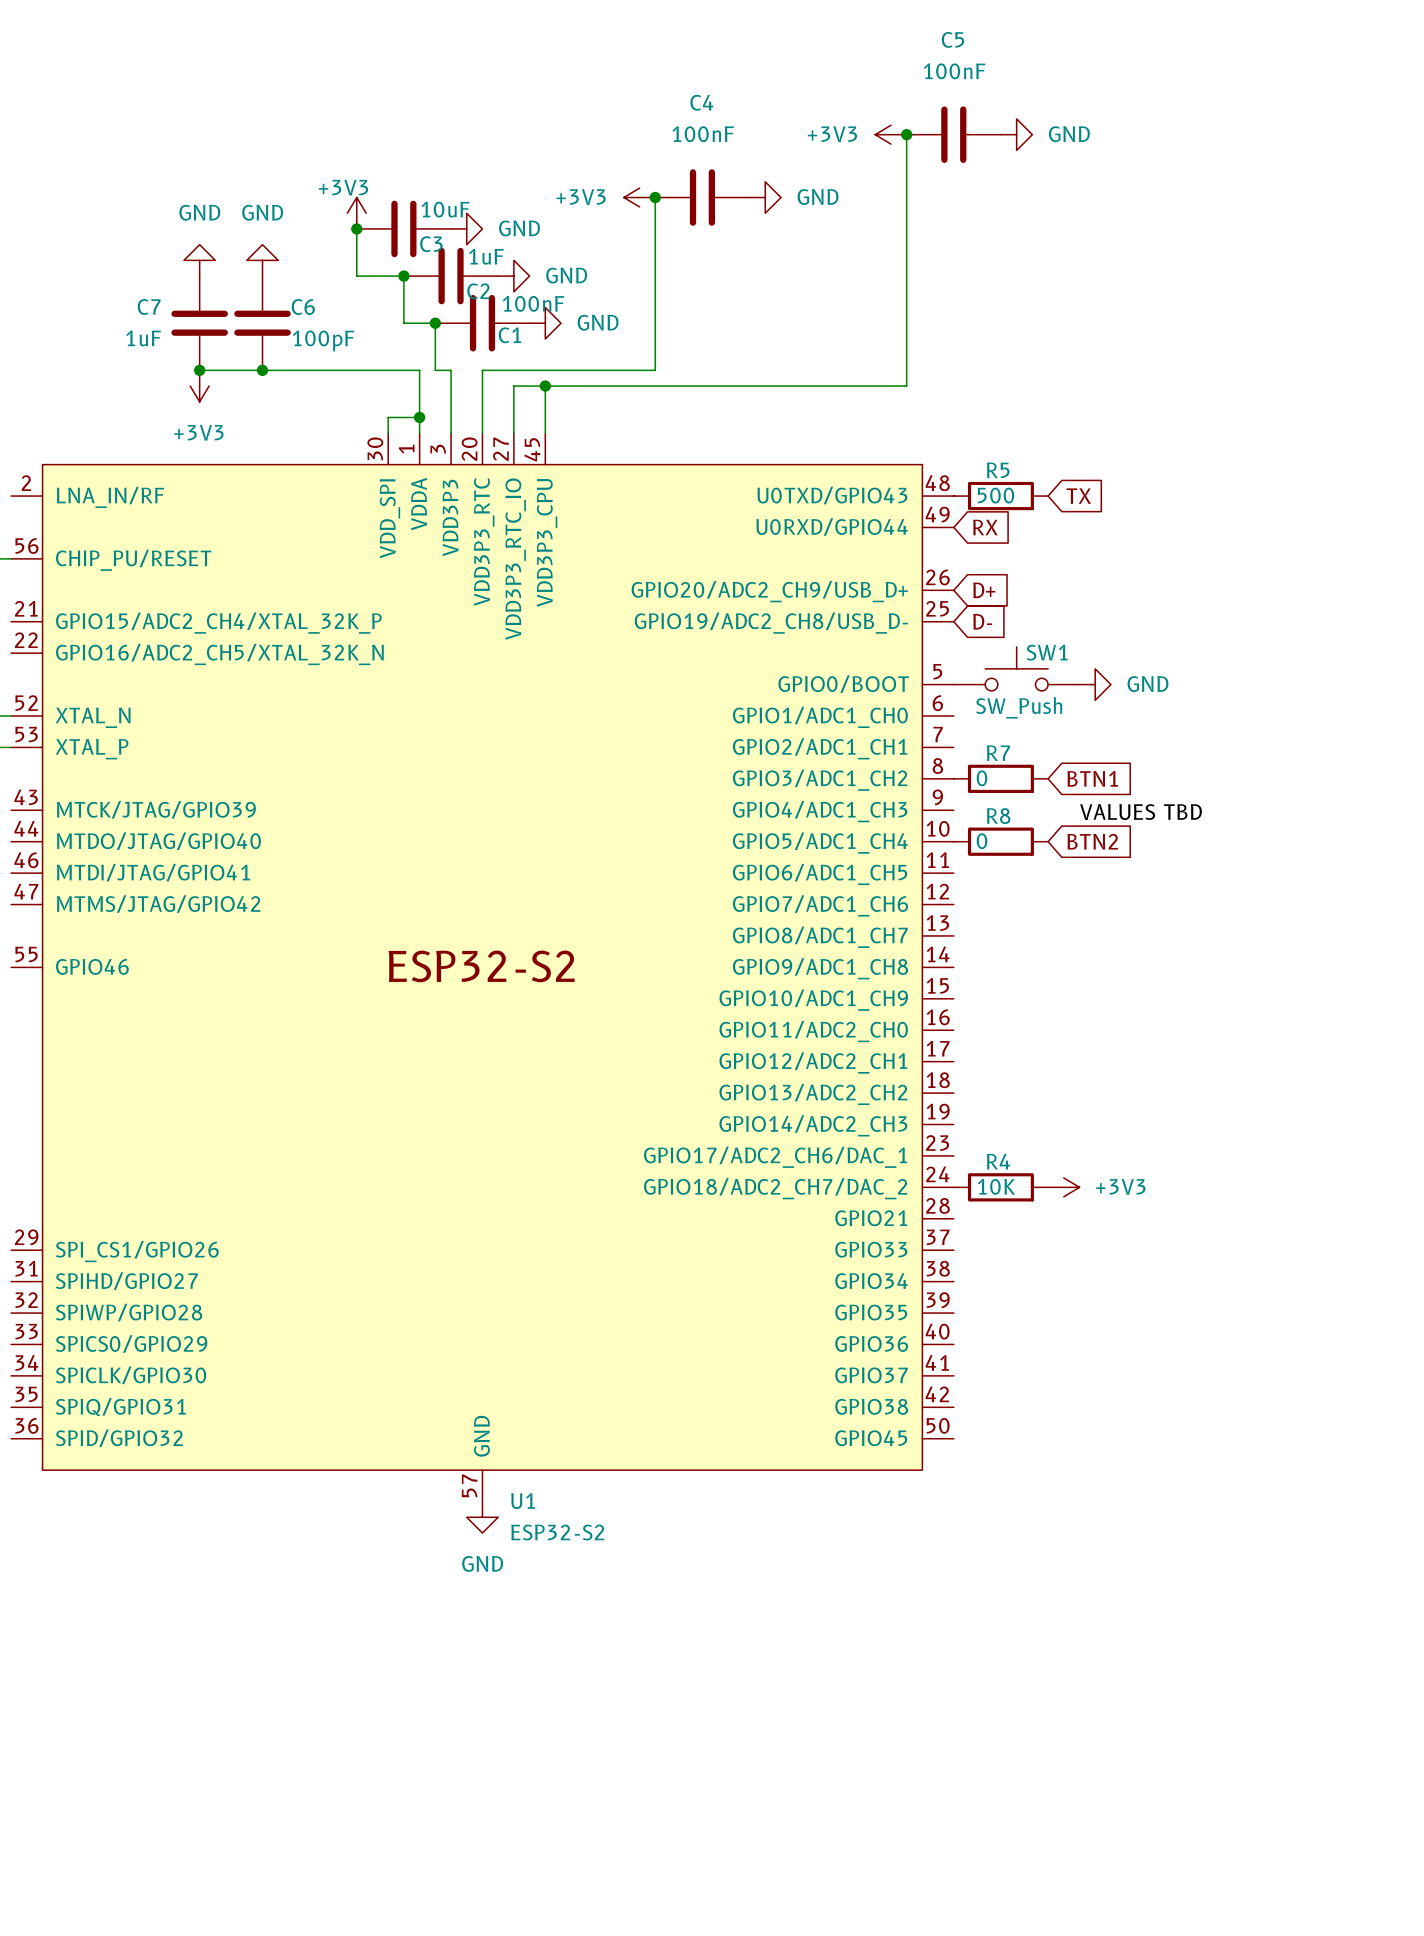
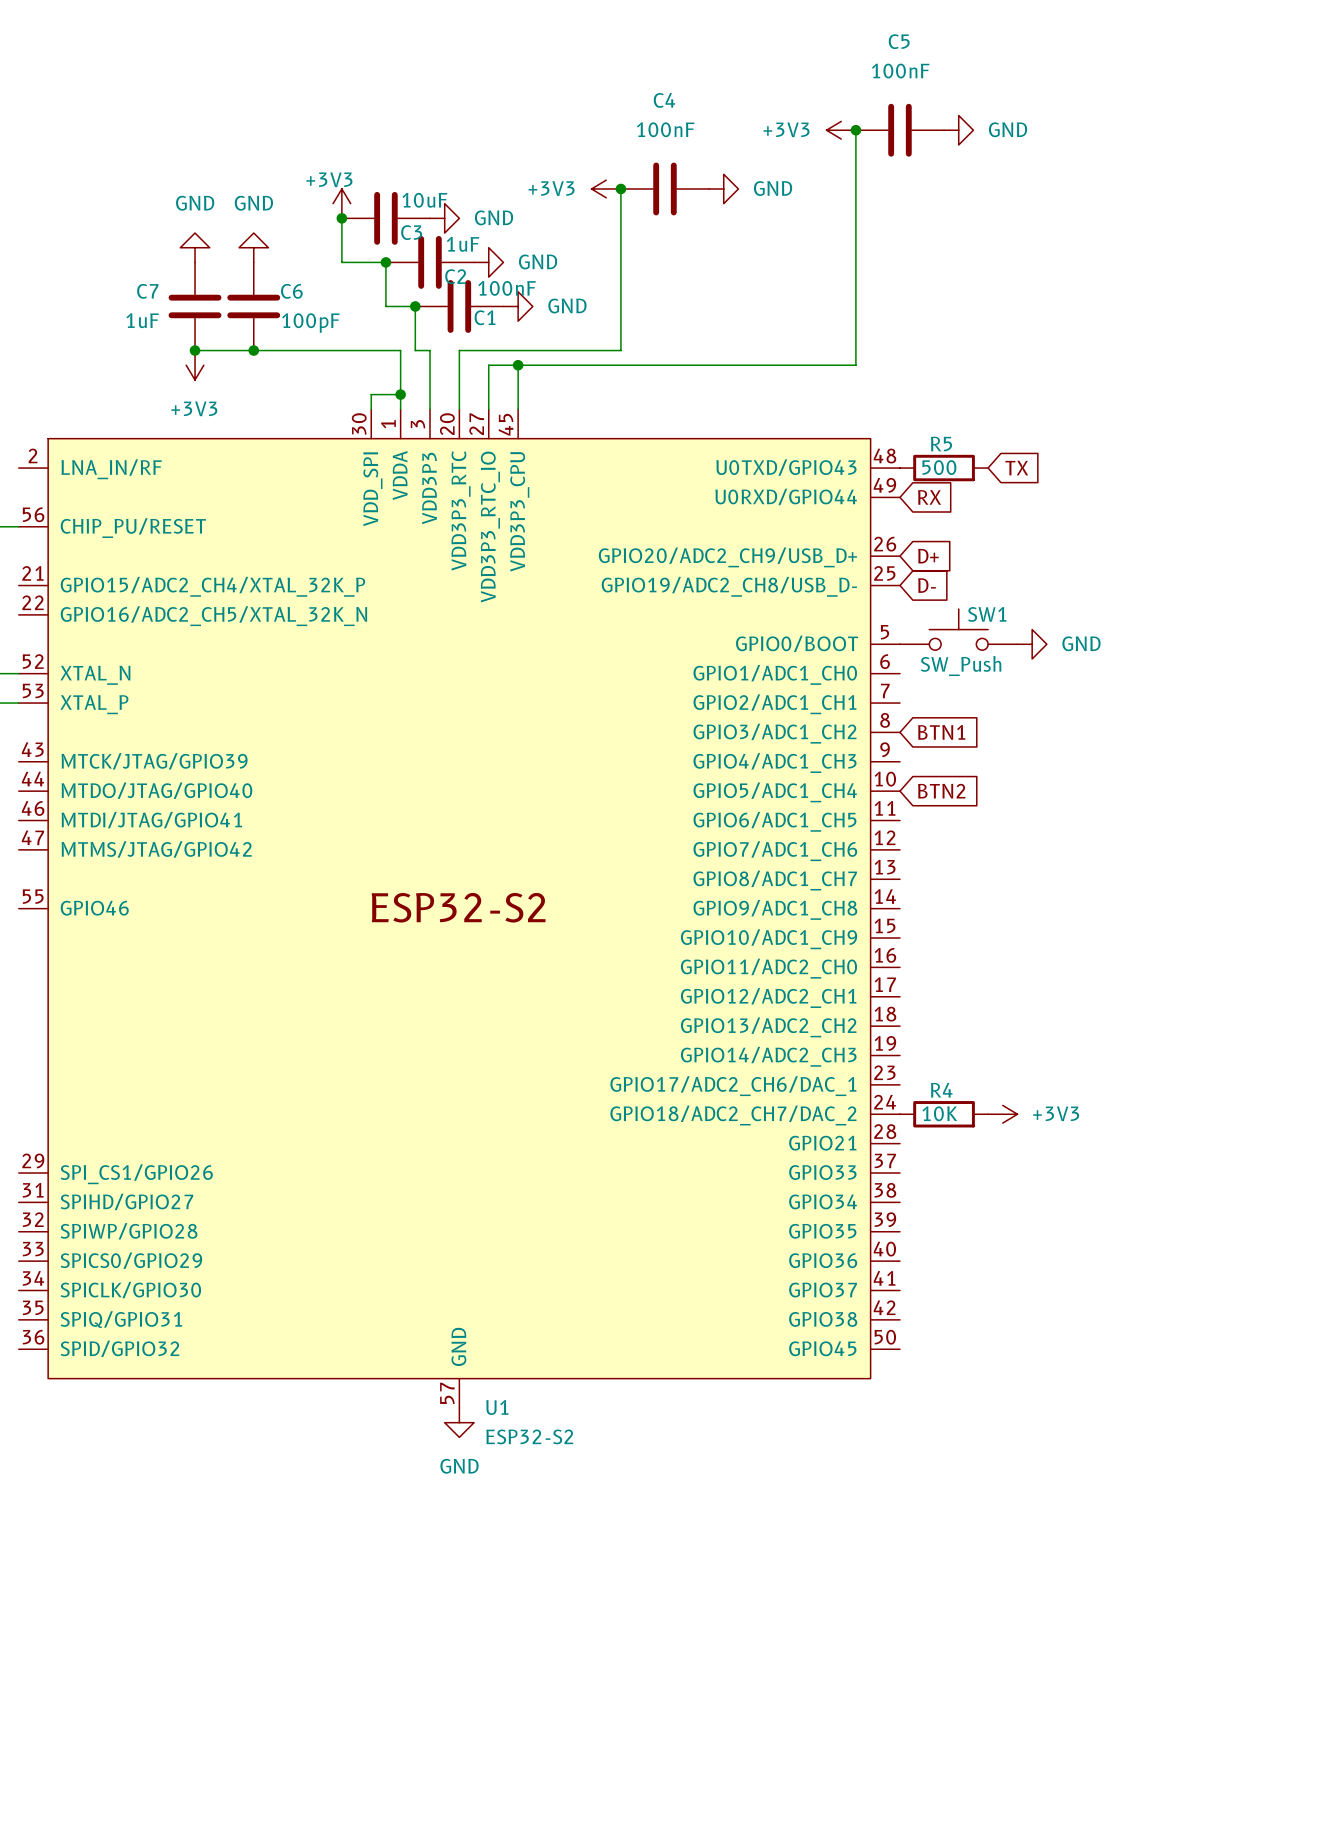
R7: 0 (1000, 778) -> none
global label position: BTN1 (1092, 778) -> BTN1 (941, 732)
label: VALUES TBD (1141, 812) -> none
R8: 0 (1000, 841) -> none
global label position: BTN2 (1092, 841) -> BTN2 (941, 791)

